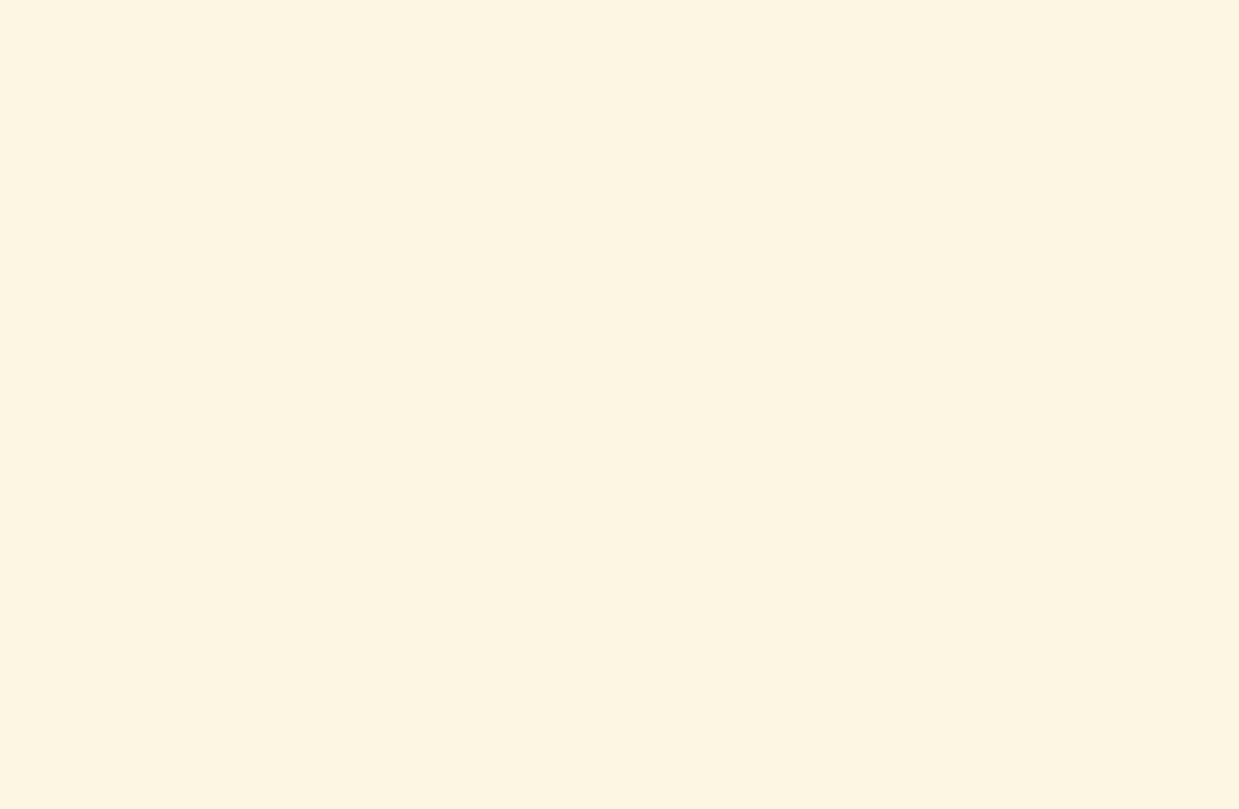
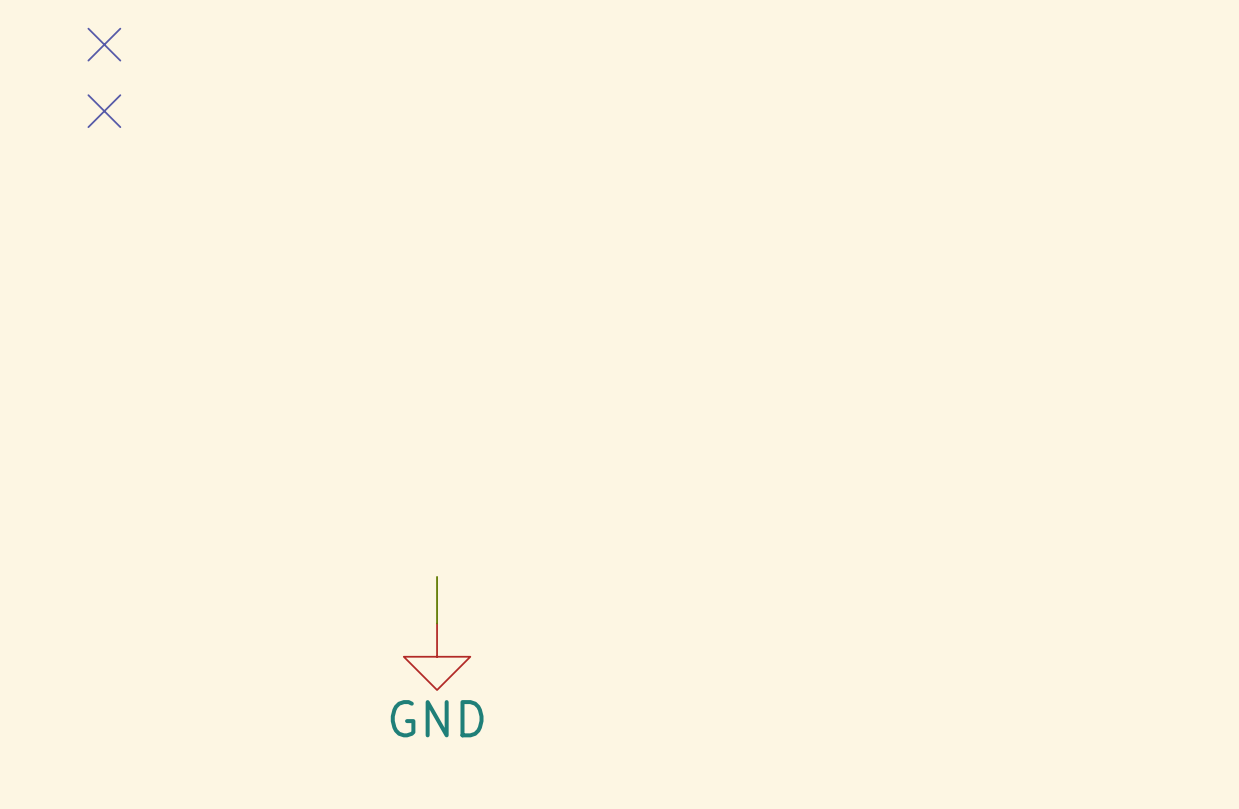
no-connect mark: none -> (104, 44)
no-connect mark: none -> (104, 111)
wire: none -> (437, 576) (437, 623)
power symbol: none -> GND (437, 656)

